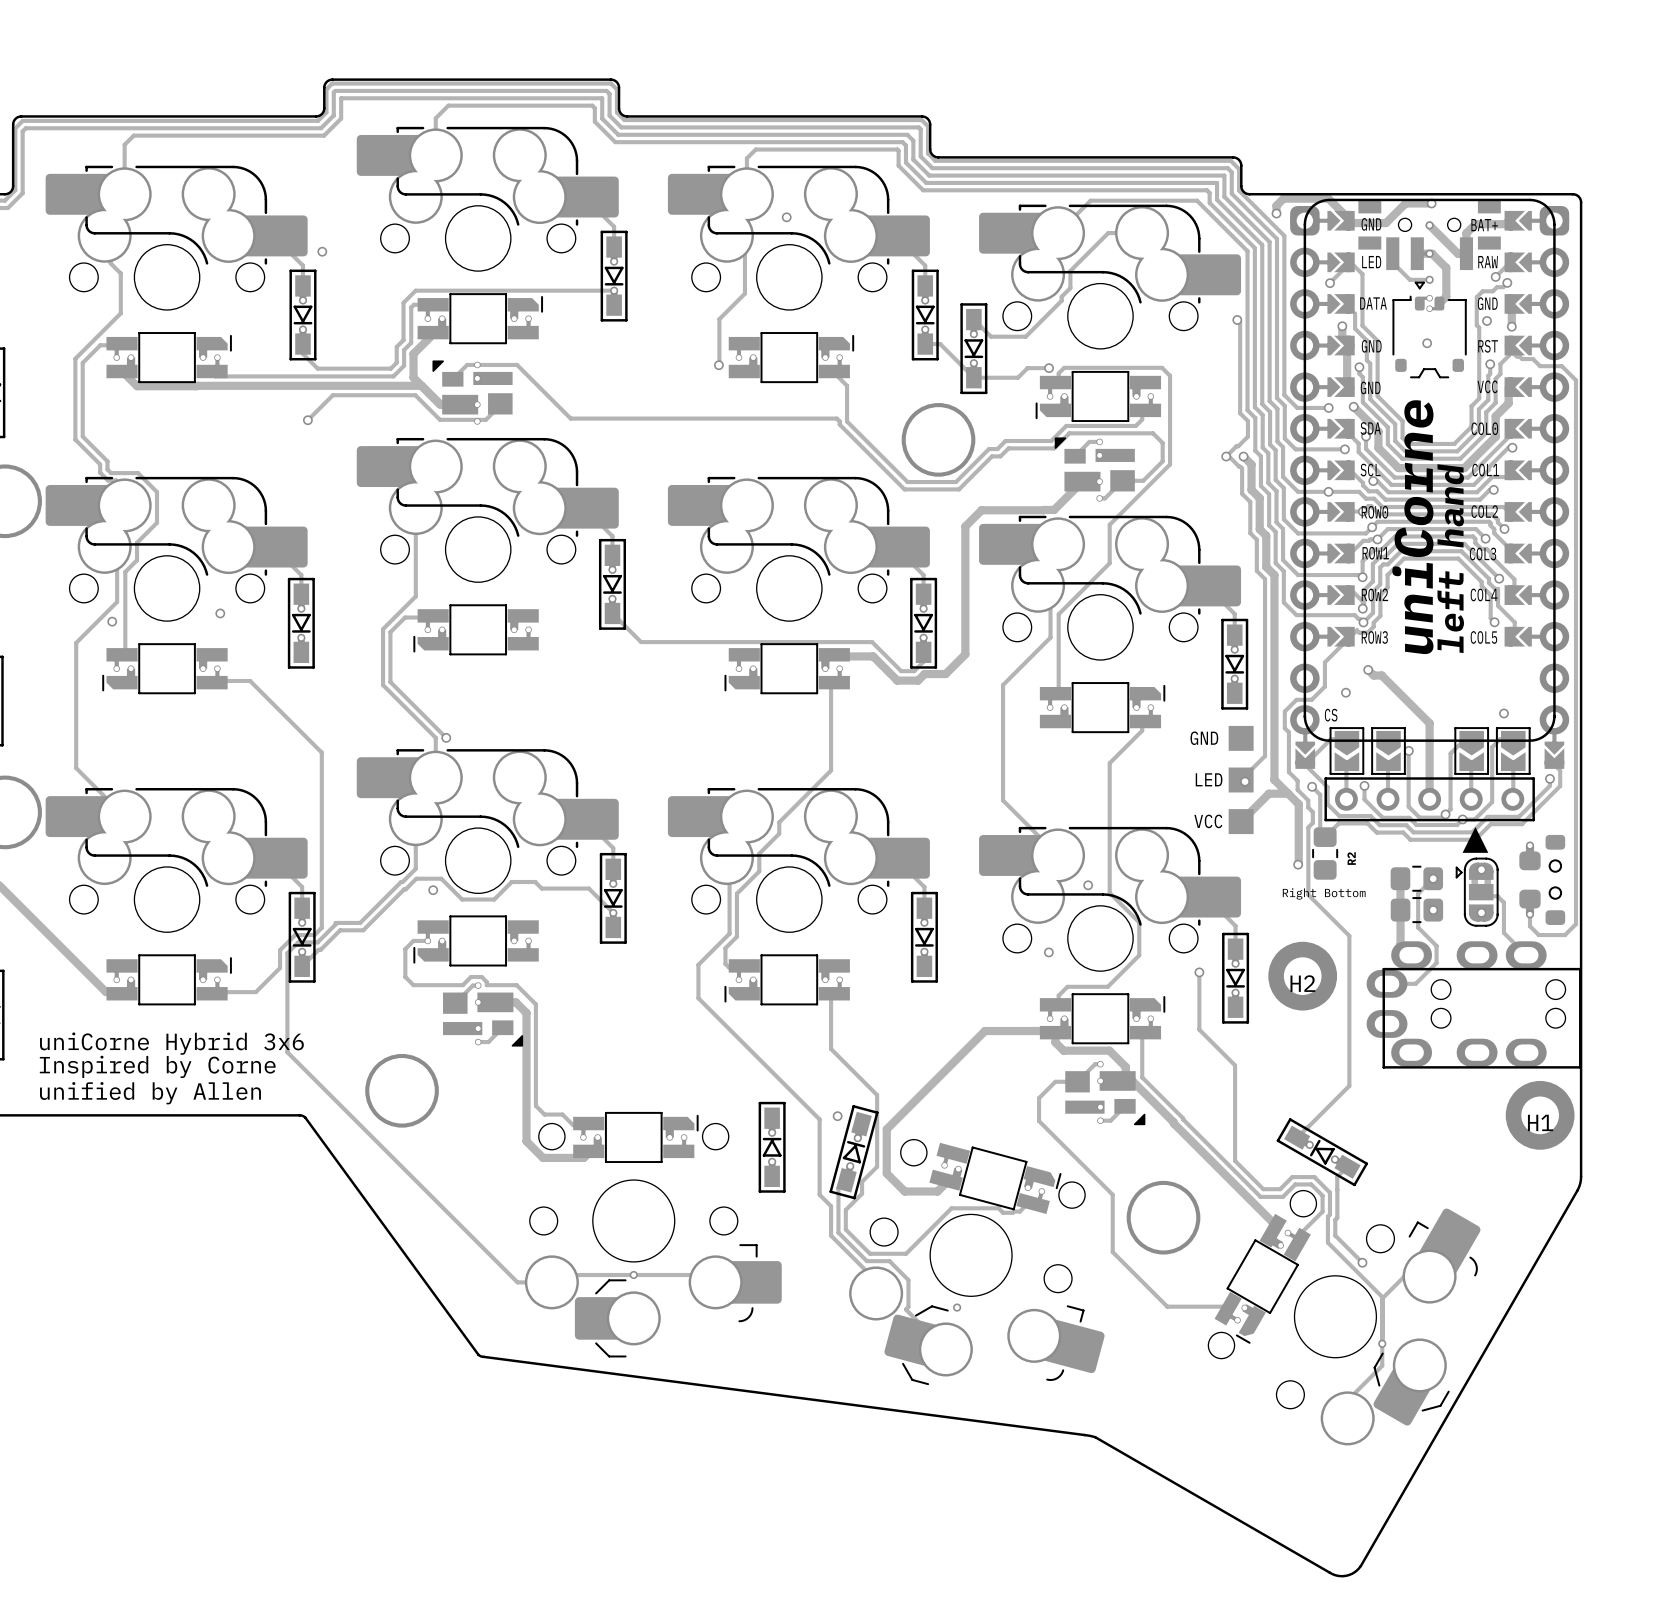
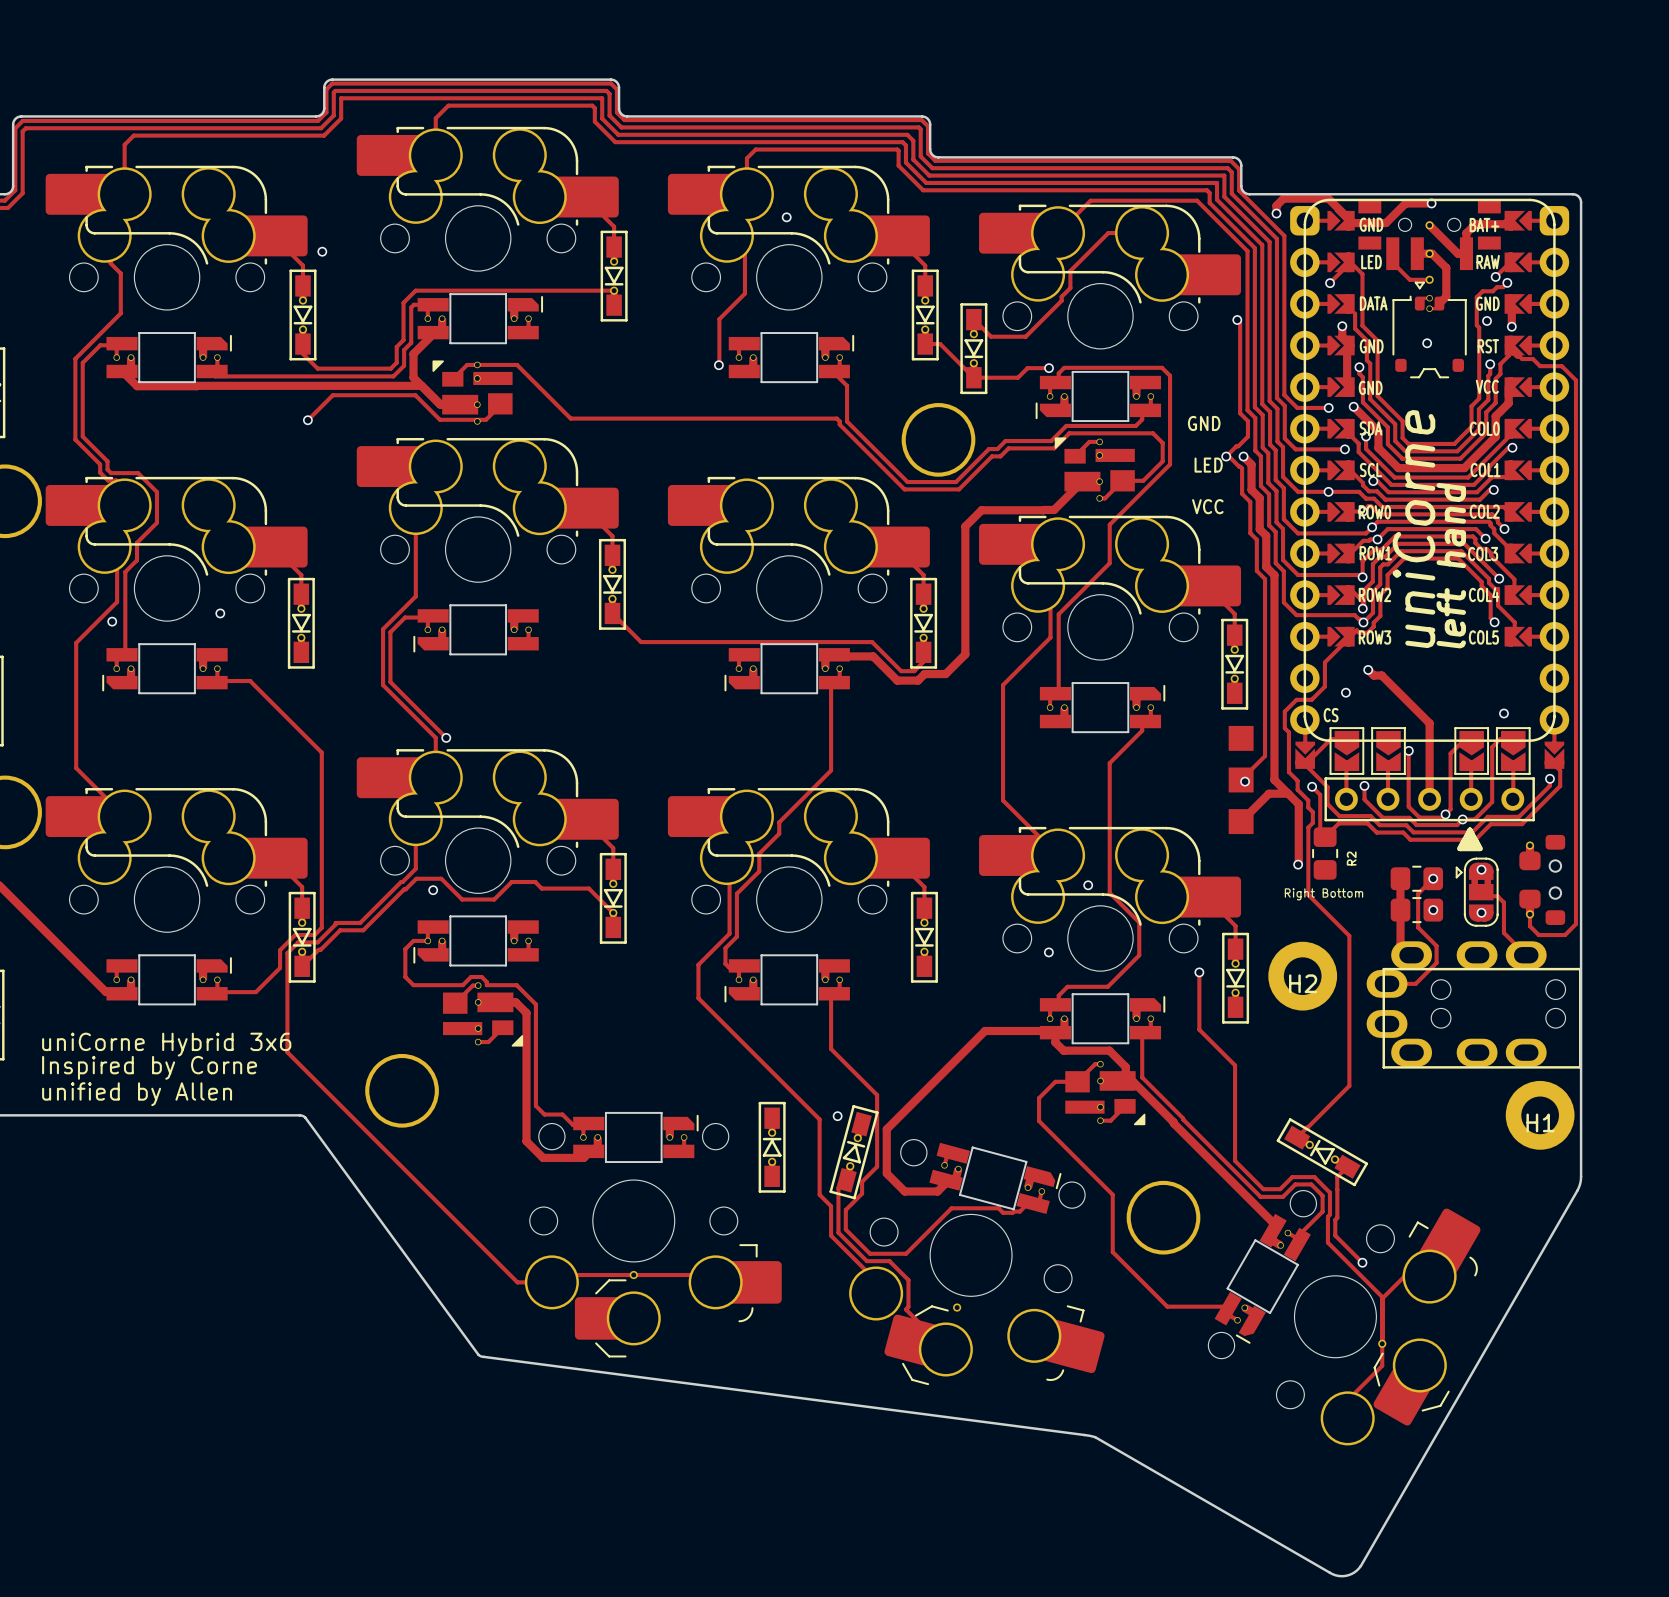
part footprint: [1290, 198, 1570, 769] -> [1290, 198, 1570, 769]
text position: GND (1204, 738) -> GND (1204, 423)
text position: LED (1209, 779) -> LED (1208, 465)
text position: VCC (1208, 821) -> VCC (1207, 506)

